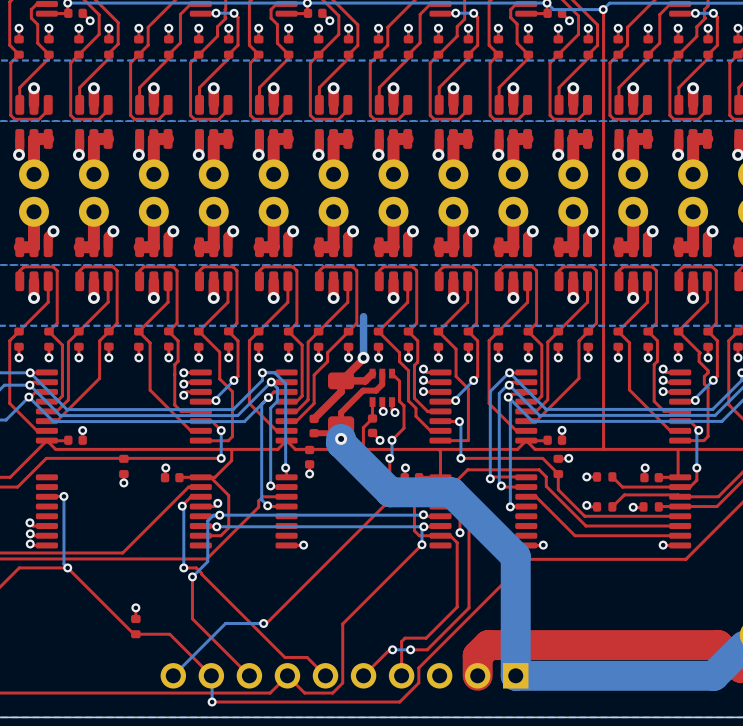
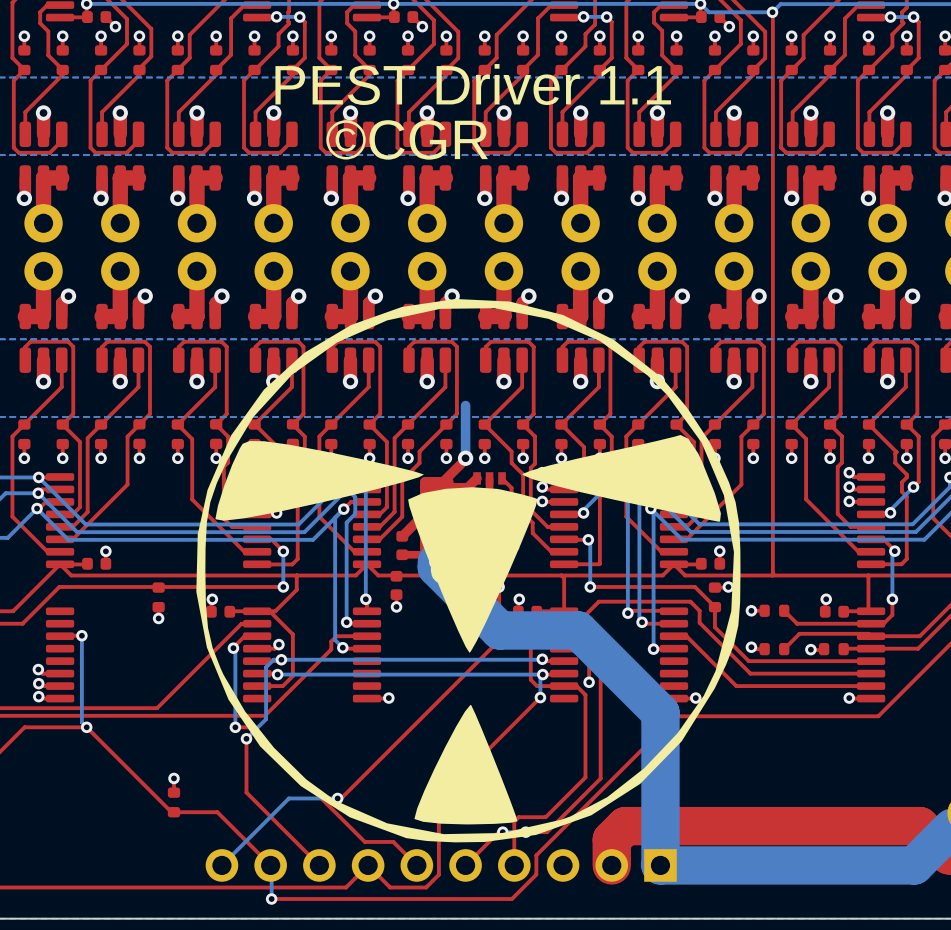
text: none -> PEST Driver 1.1 (473, 84)
text: none -> ©CGR (407, 139)
part: none -> (468, 570)

